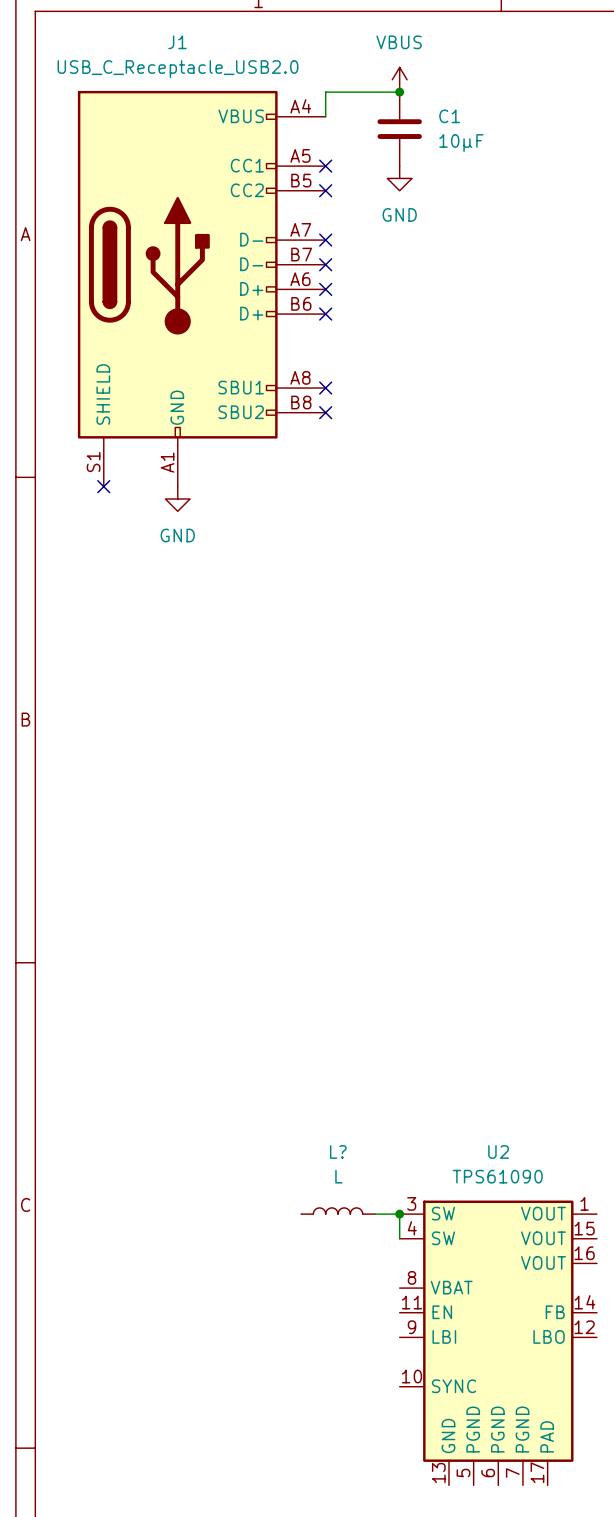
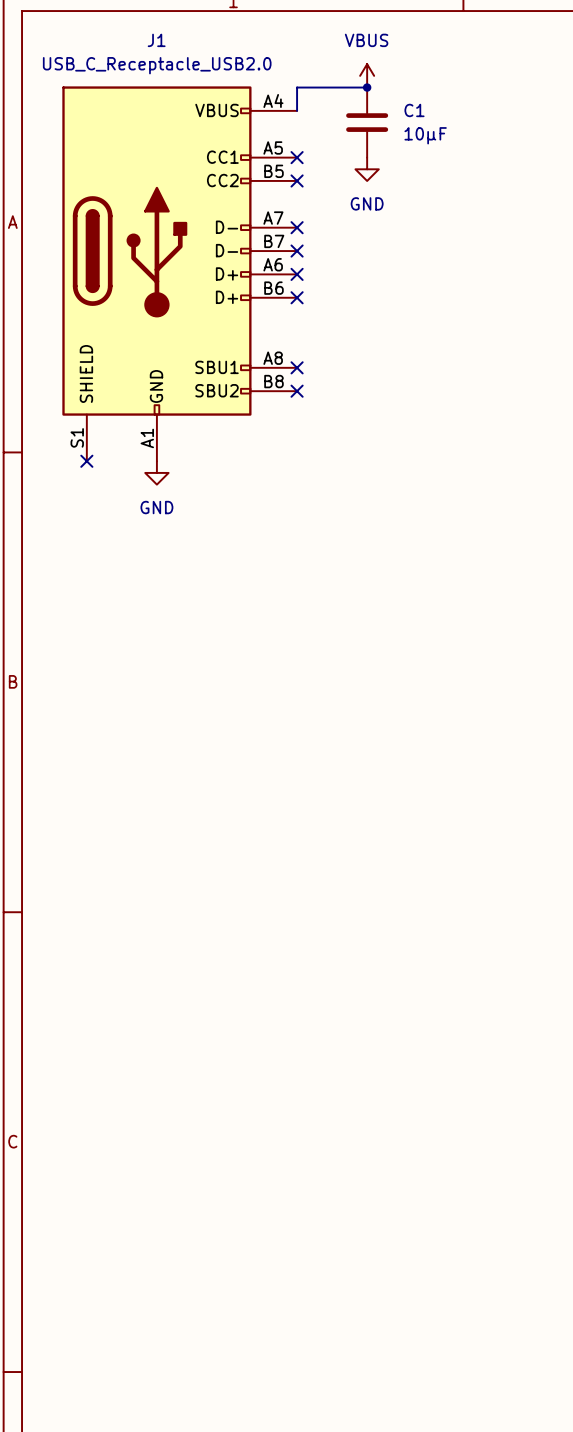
L?: L (338, 1211) -> none
wire: (375, 1214) (399, 1214) (399, 1238) -> none
junction: (399, 1214) -> none
U2: TPS61090 (498, 1342) -> none

